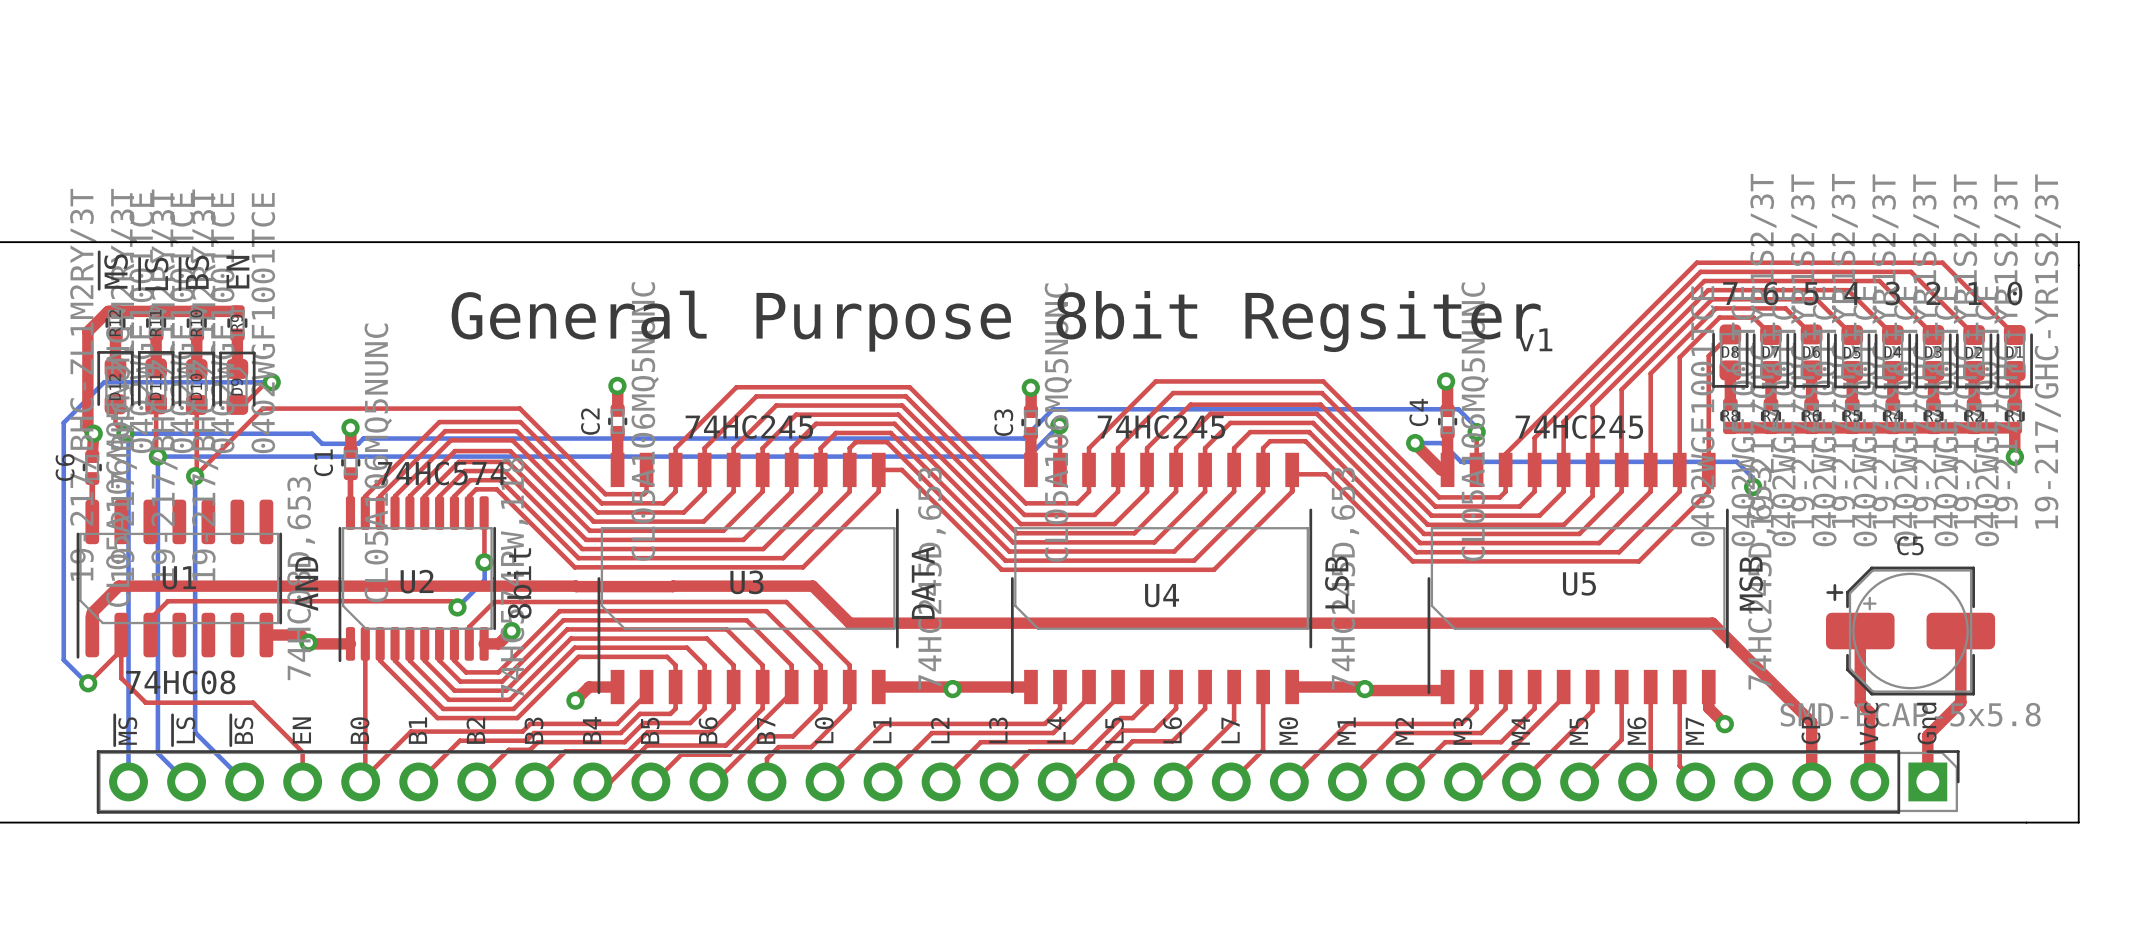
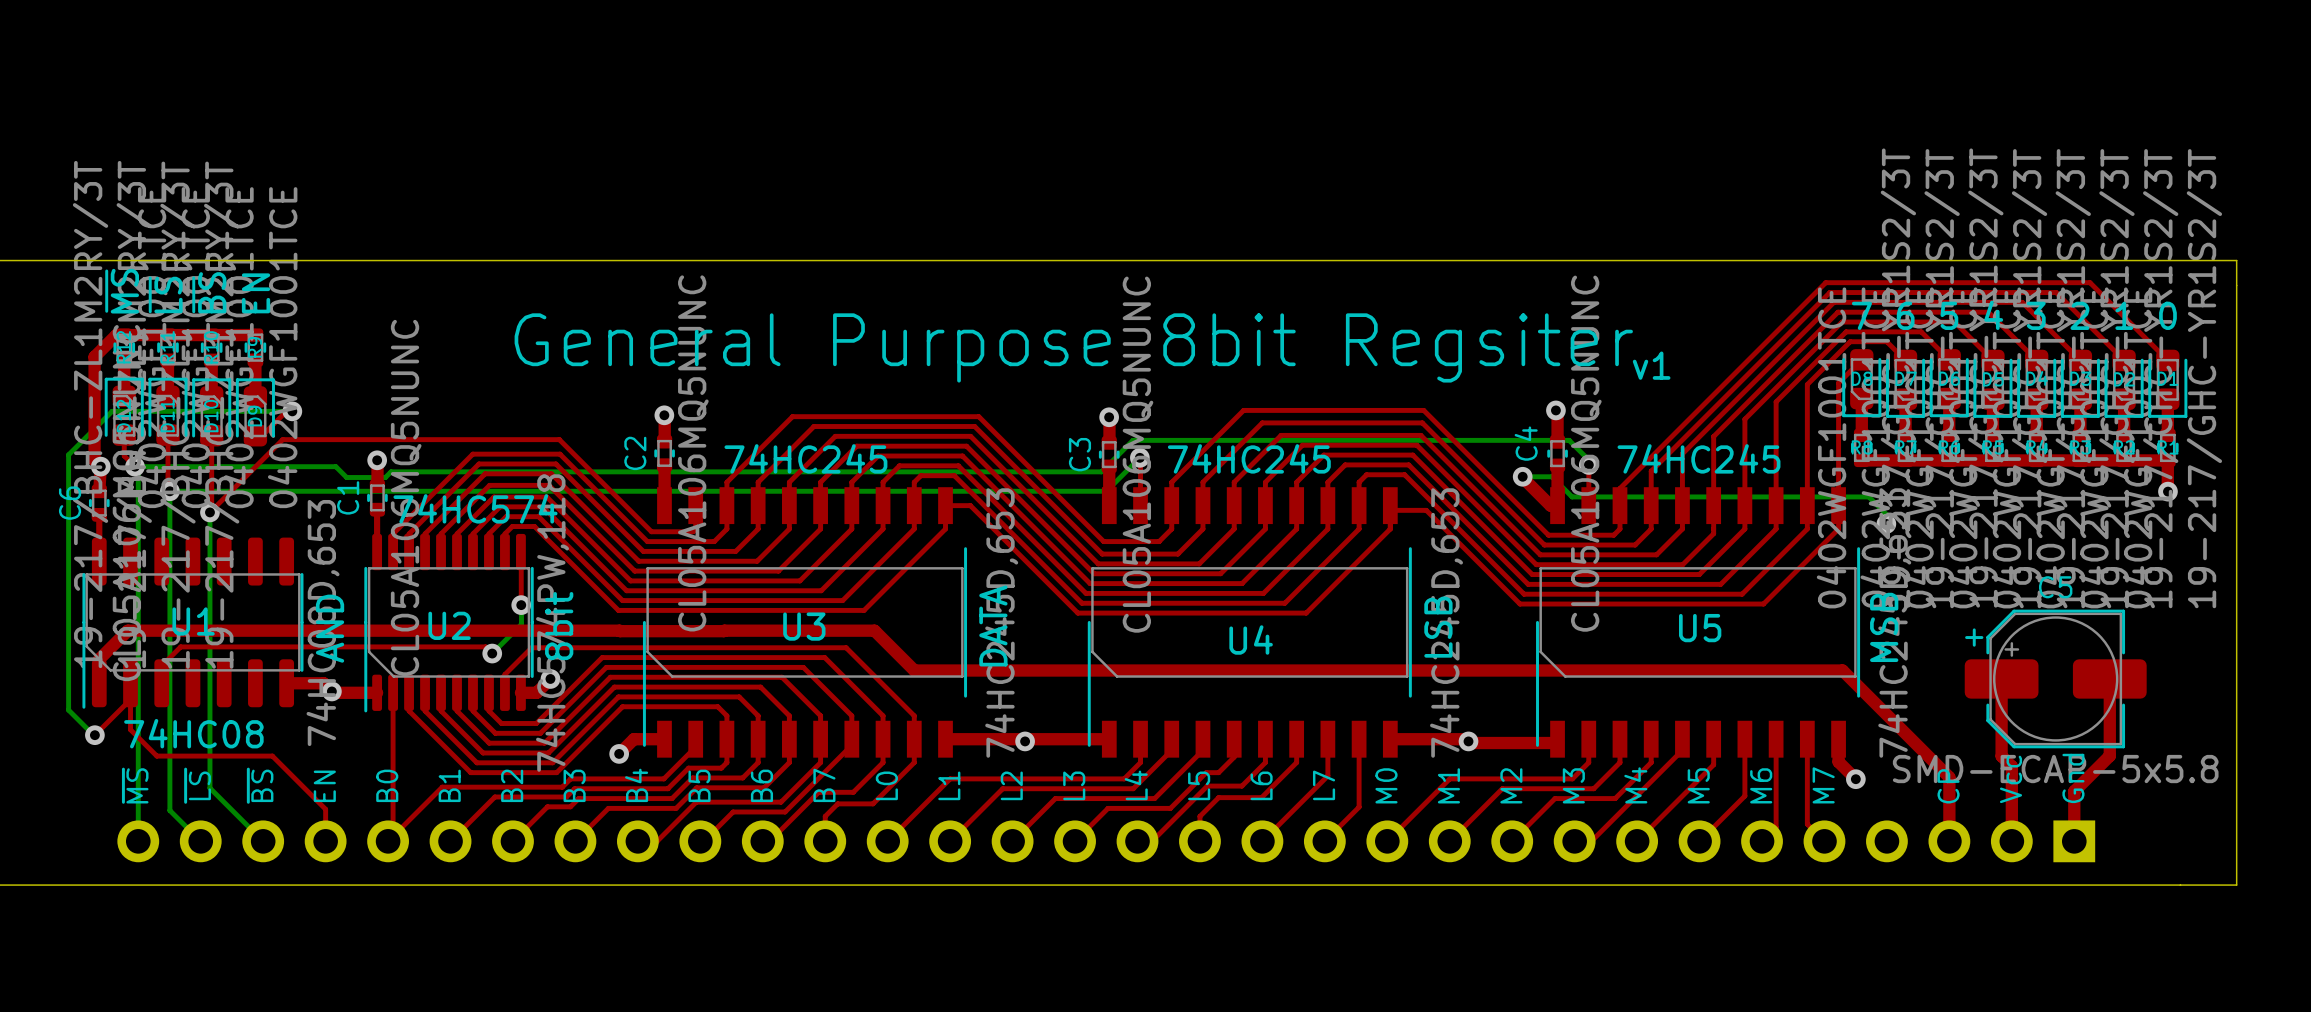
part side: top (1028, 781) -> bottom (1106, 841)

